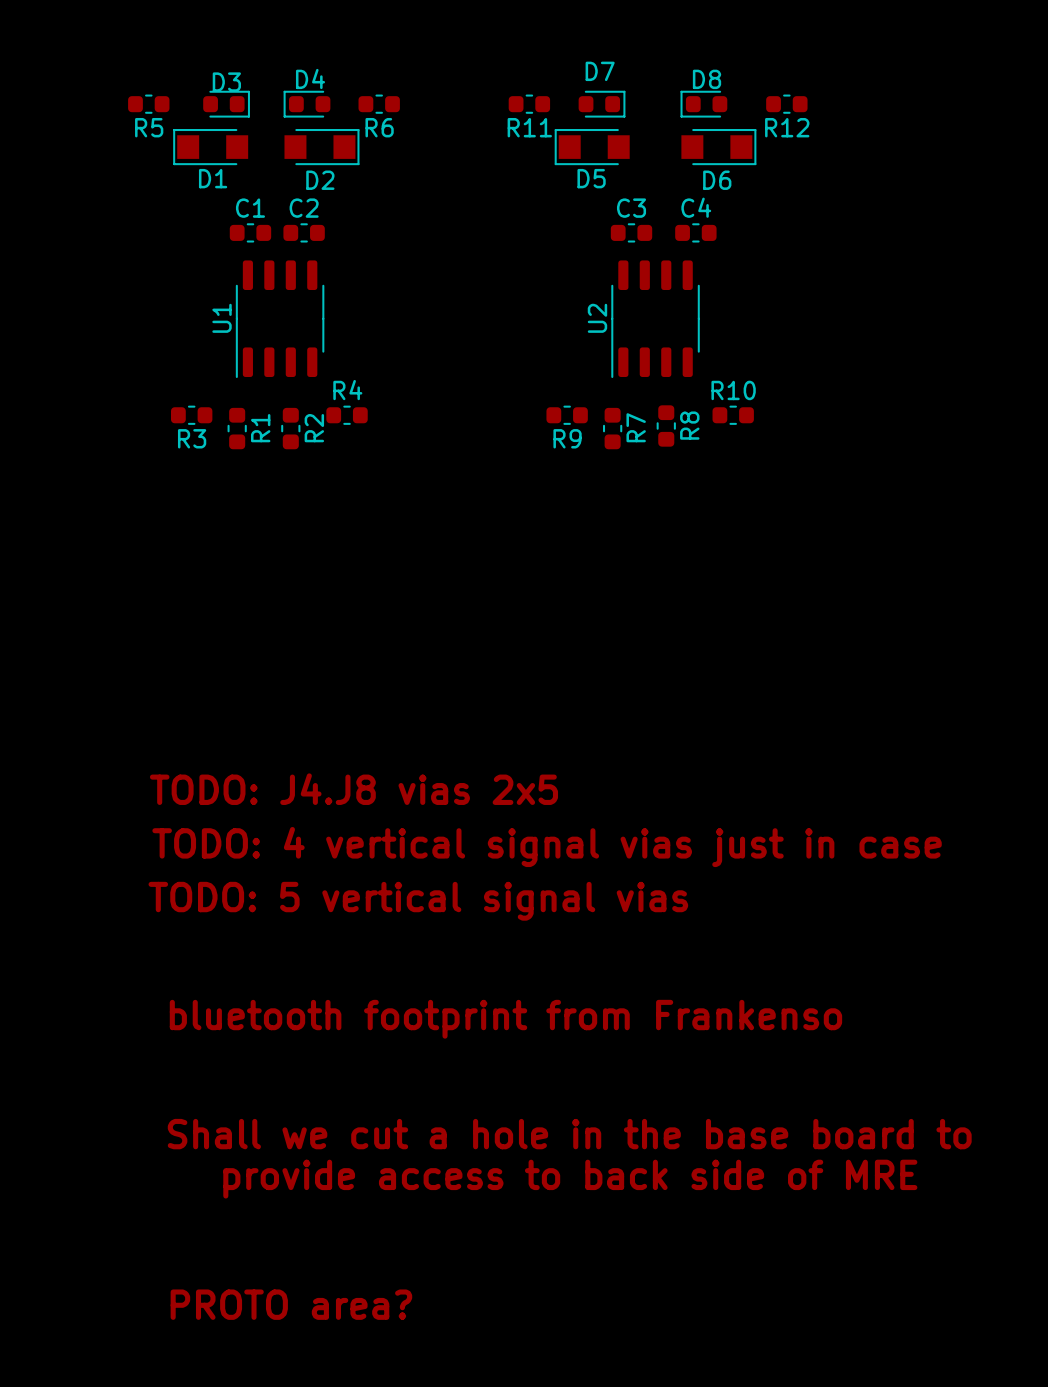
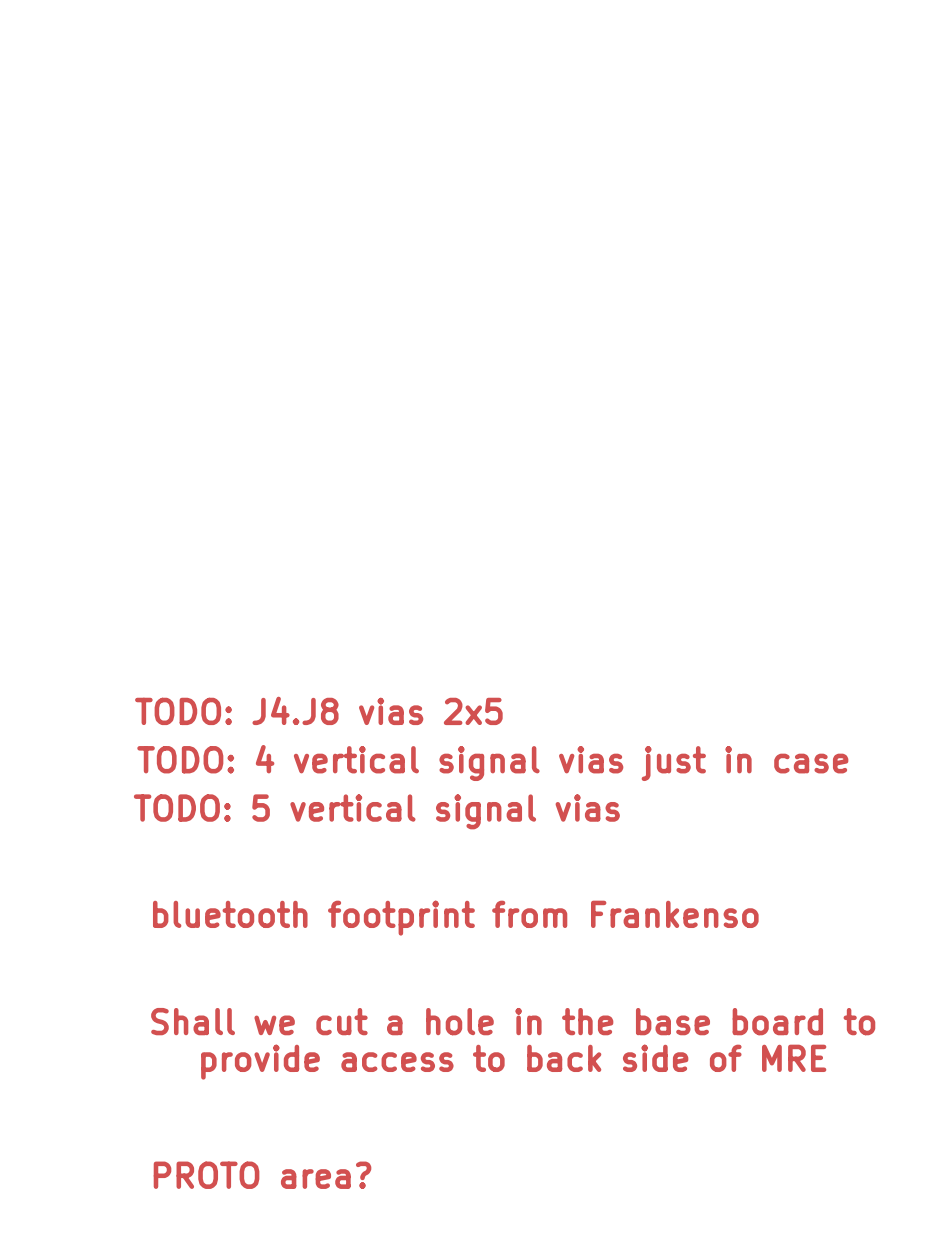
R5: (148, 104) -> none
D3: (226, 104) -> none
D4: (306, 104) -> none
R6: (379, 104) -> none
R11: (529, 104) -> none
D7: (602, 104) -> none
D8: (703, 104) -> none
R12: (786, 104) -> none
D1: (210, 147) -> none
D2: (321, 147) -> none
D5: (592, 147) -> none
D6: (718, 147) -> none
C1: (250, 232) -> none
C2: (304, 232) -> none
C3: (631, 232) -> none
C4: (695, 232) -> none
U1: (280, 319) -> none
U2: (655, 319) -> none
R3: (191, 415) -> none
R4: (347, 415) -> none
R9: (567, 415) -> none
R10: (733, 415) -> none
R8: (666, 425) -> none
R1: (237, 428) -> none
R2: (290, 428) -> none
R7: (612, 428) -> none

